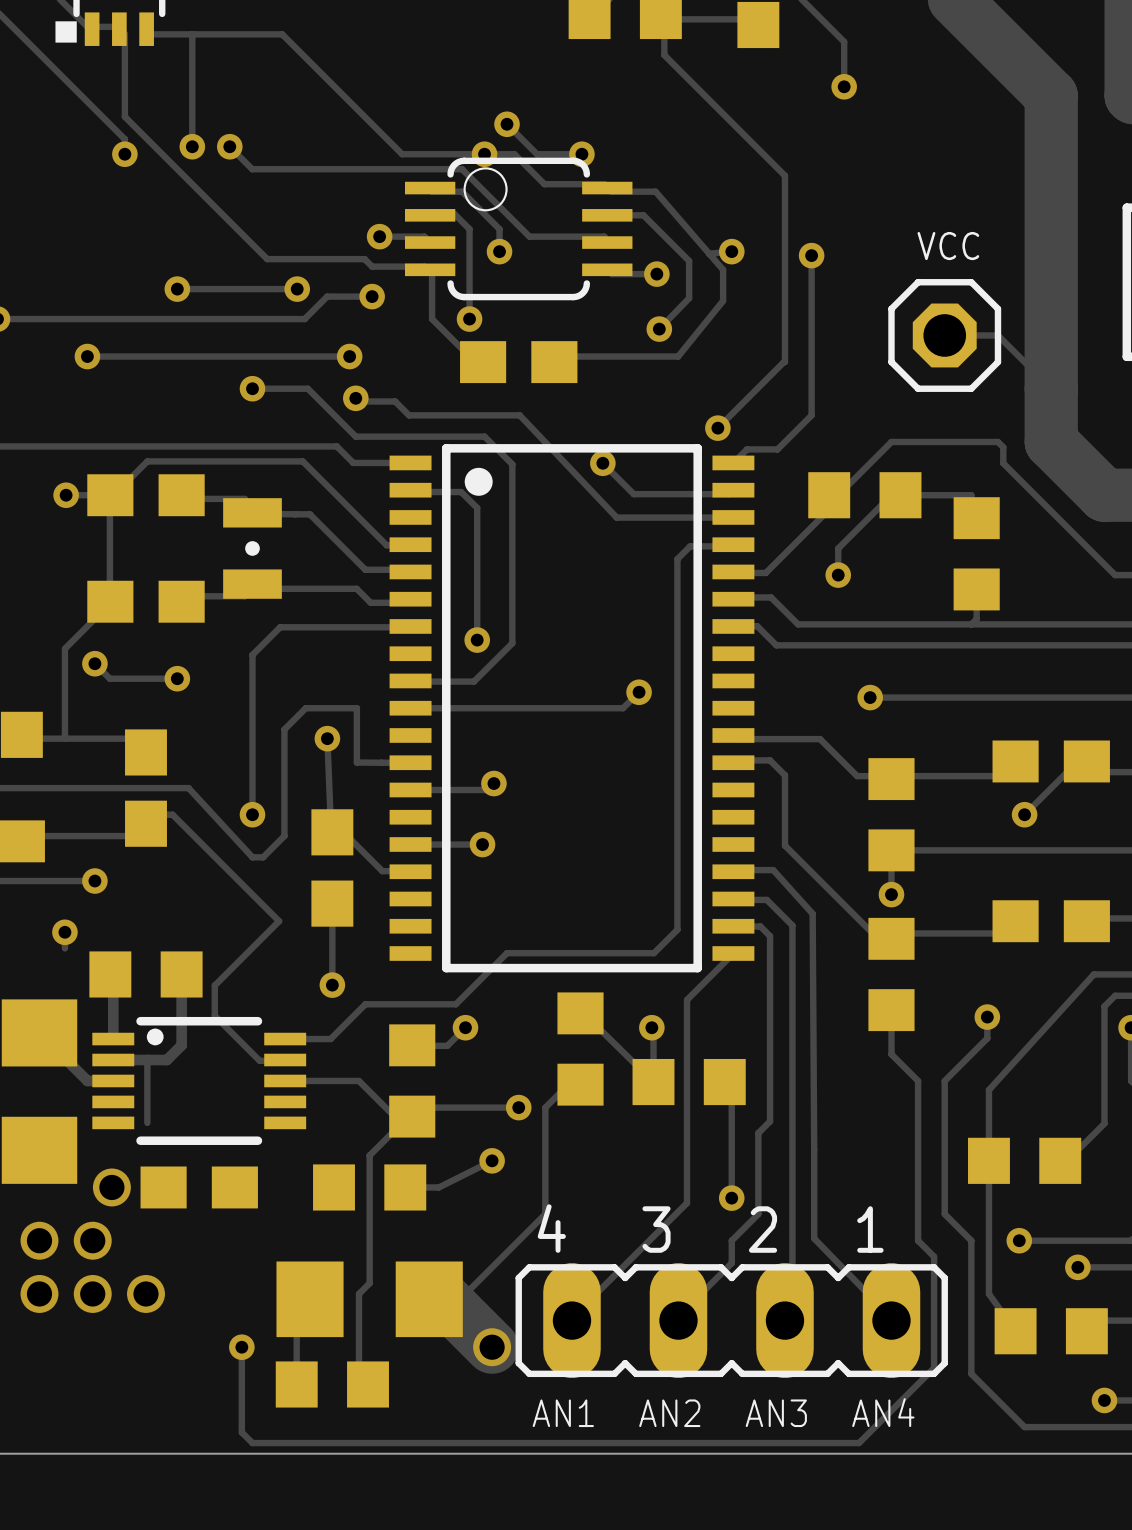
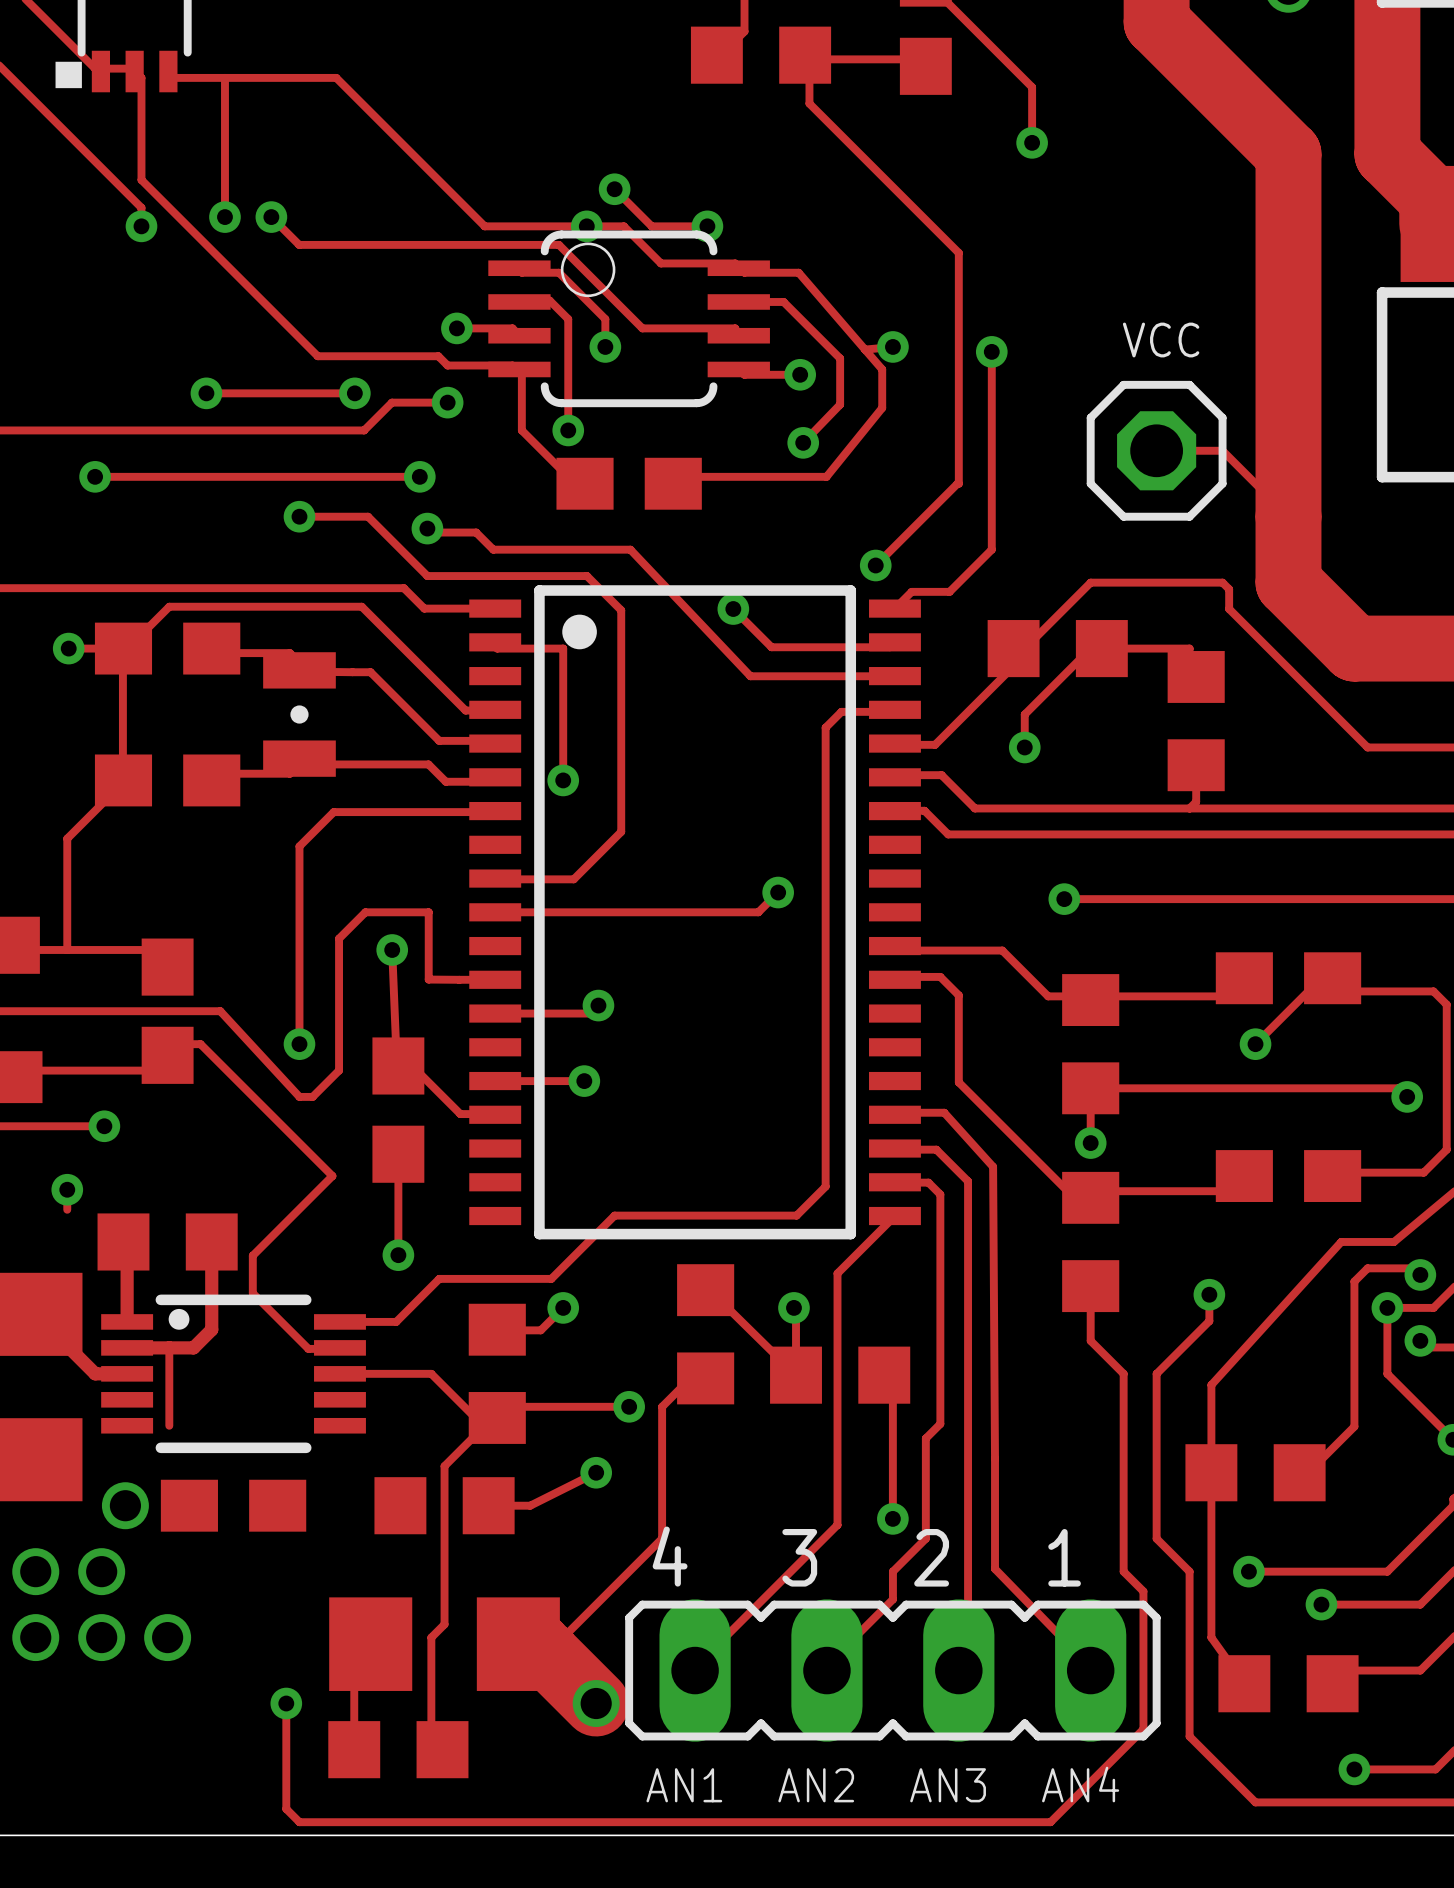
track: (410, 490) (412, 492) (461, 492) (477, 508) (477, 640) -> (495, 642) (497, 648) (563, 648) (563, 780)
via position: (477, 640) -> (563, 780)
track: (94, 663) (109, 678) (177, 678) -> none
via: (94, 663) -> none
via: (177, 678) -> none

